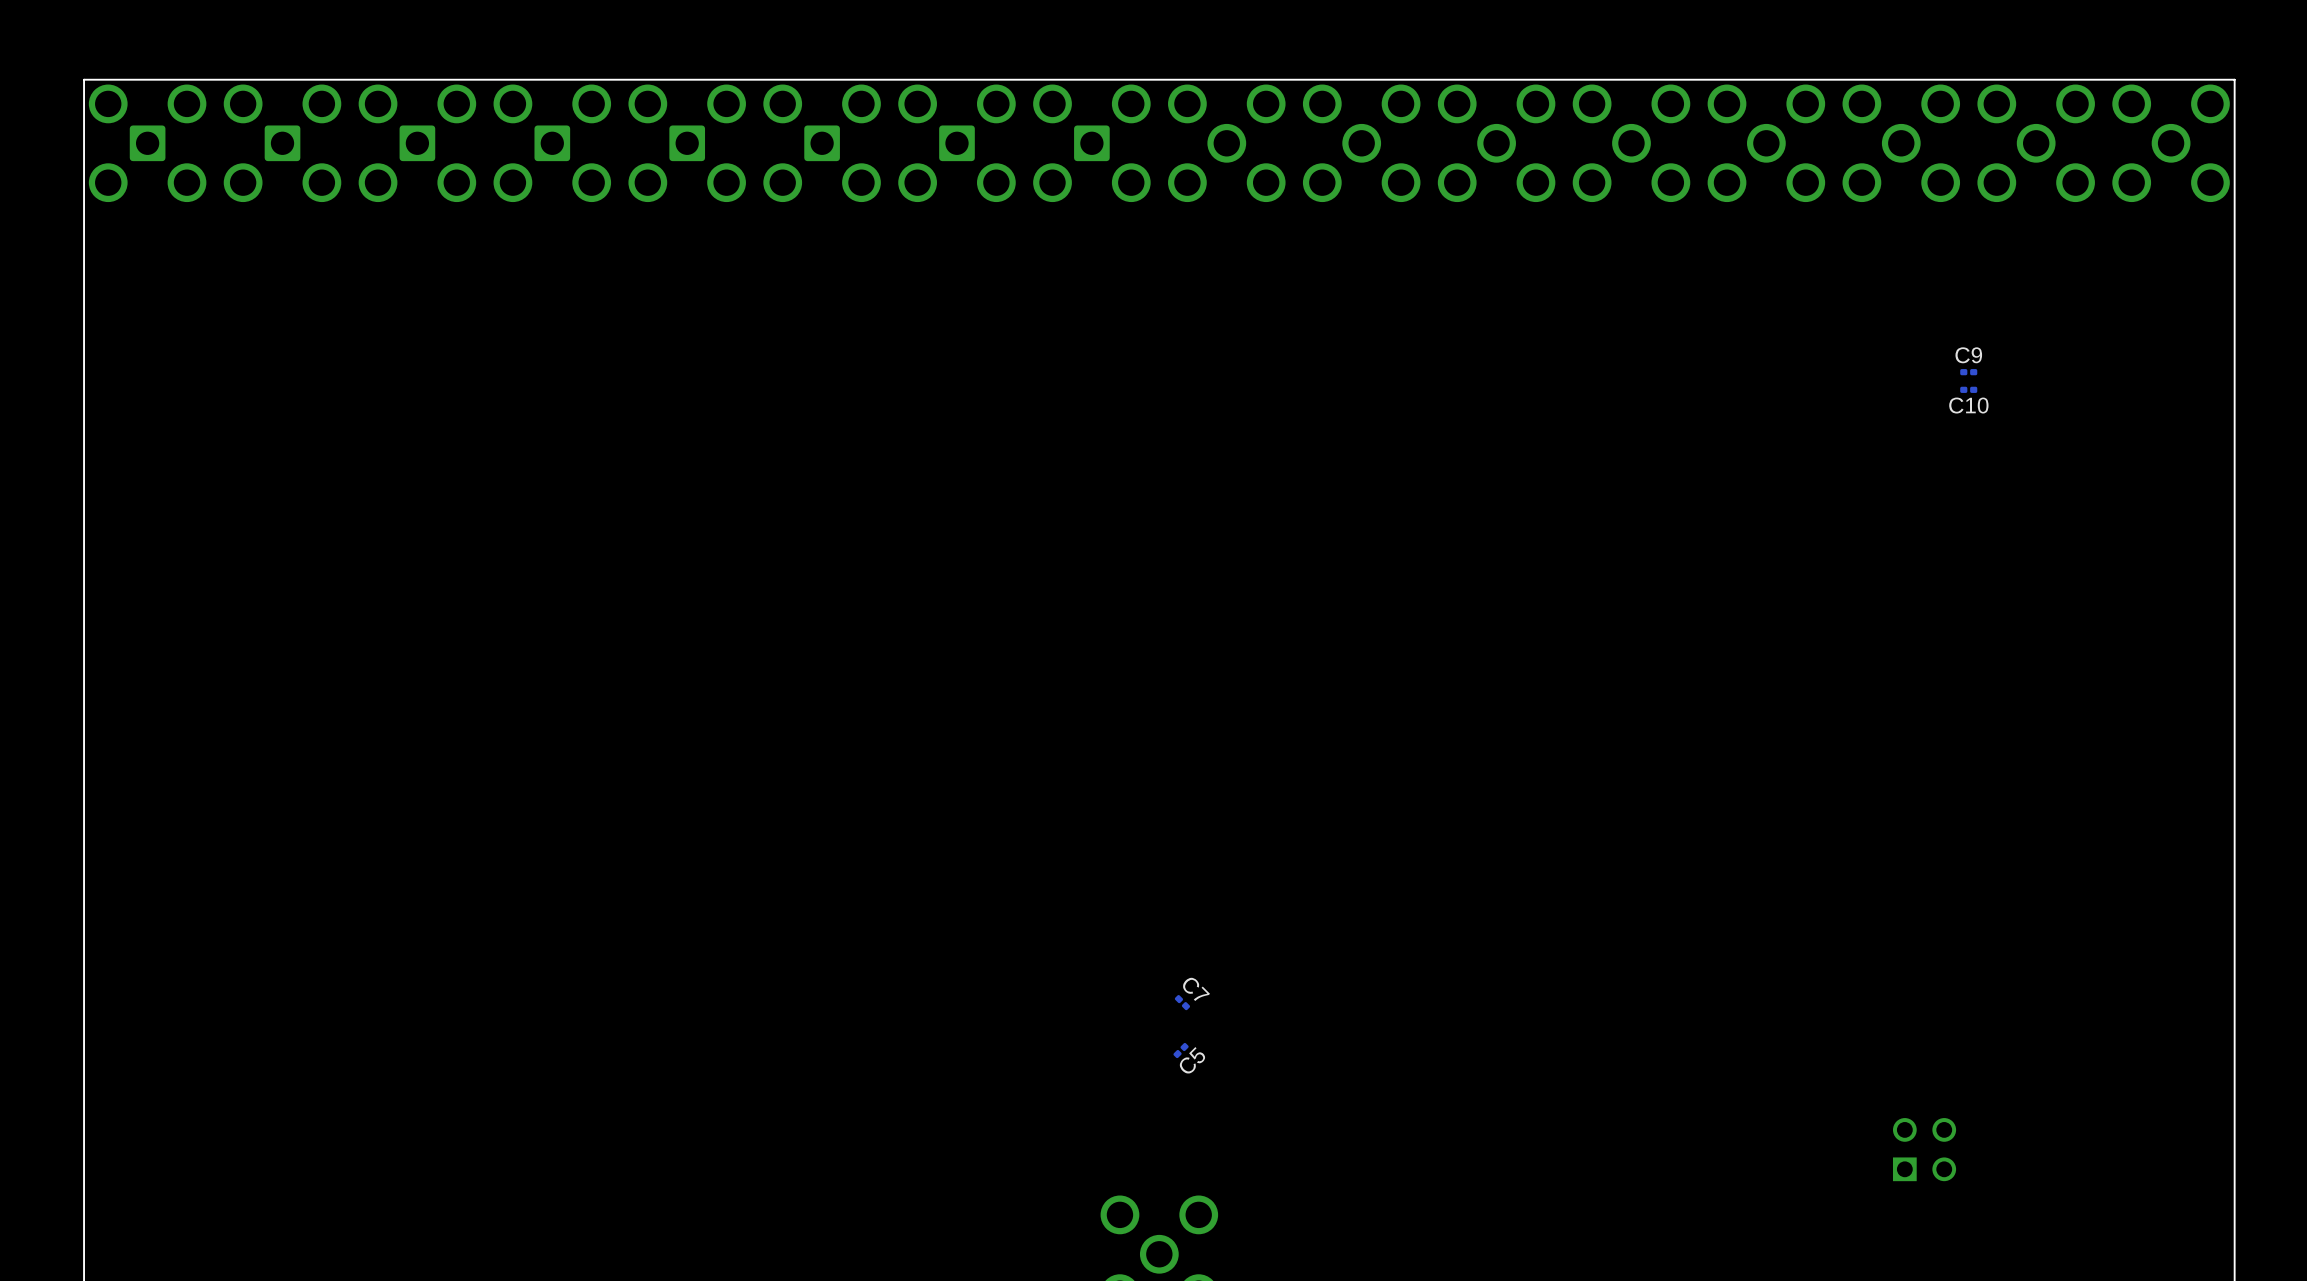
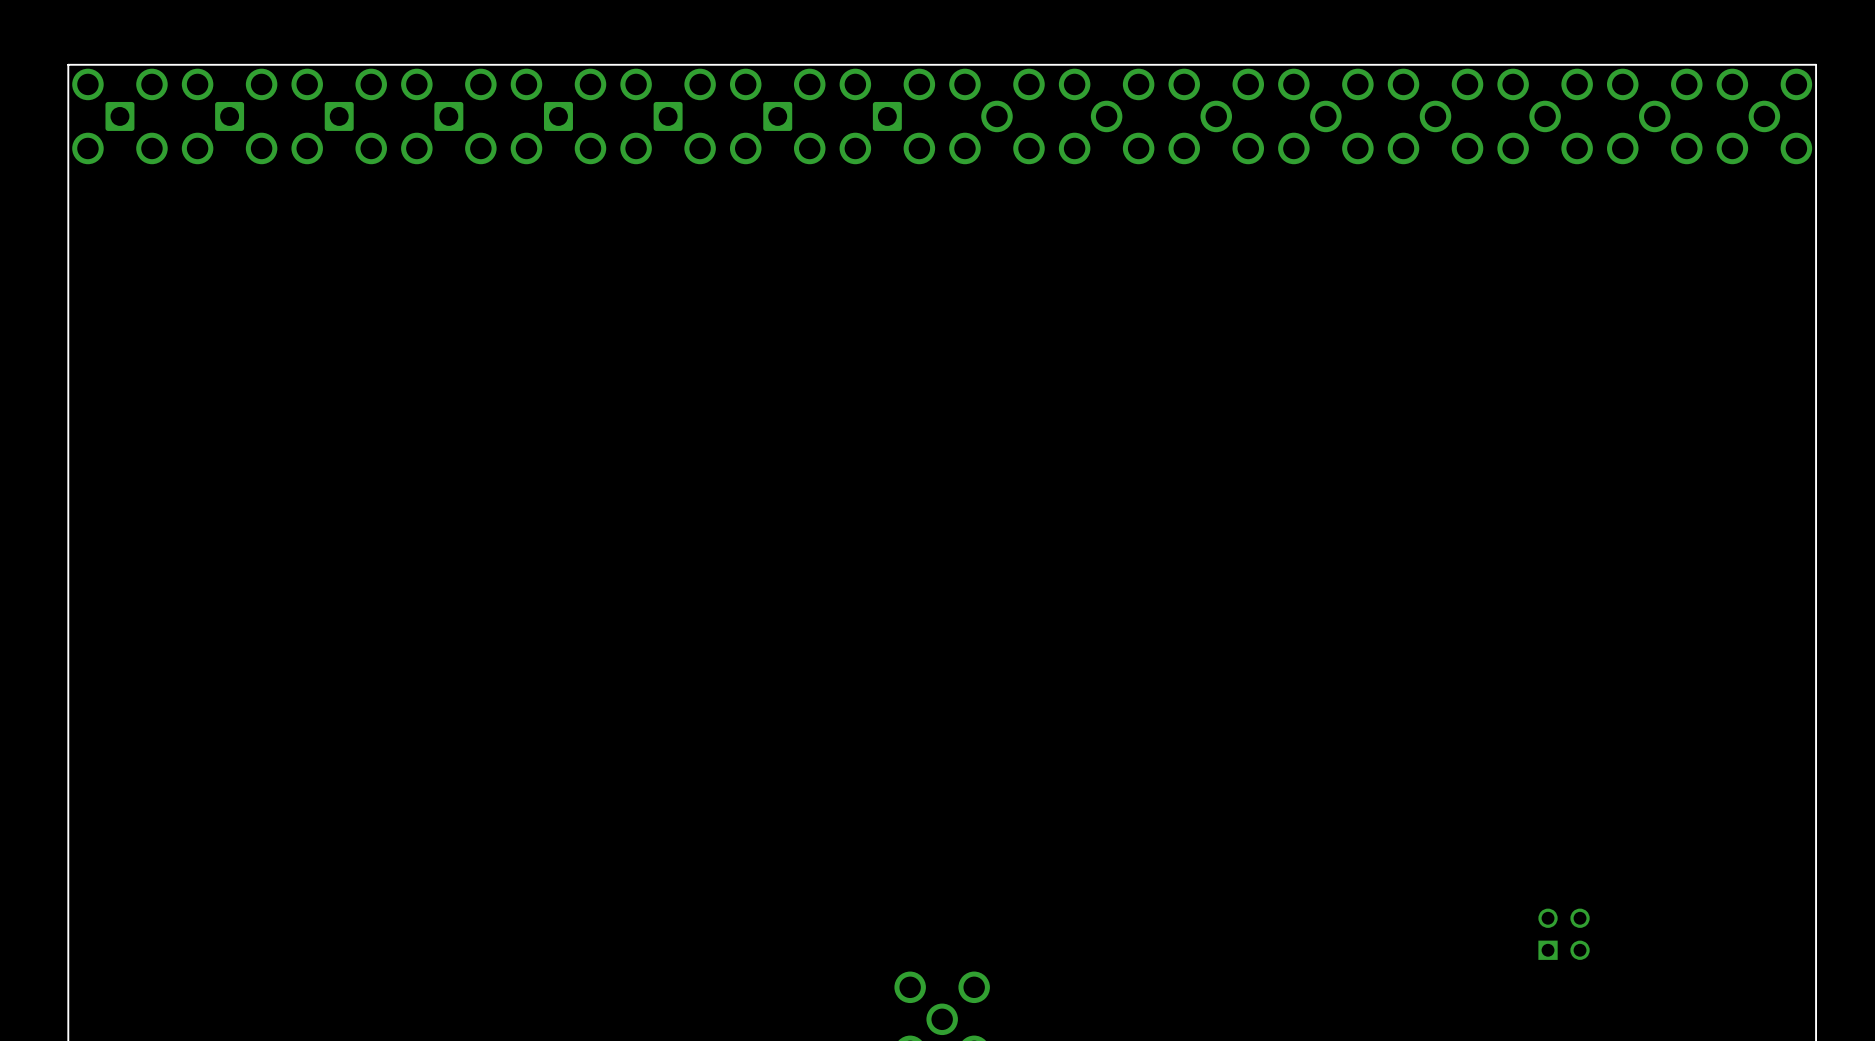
C9: (1968, 372) -> none
C10: (1968, 389) -> none
C7: (1182, 1002) -> none
C5: (1181, 1050) -> none

